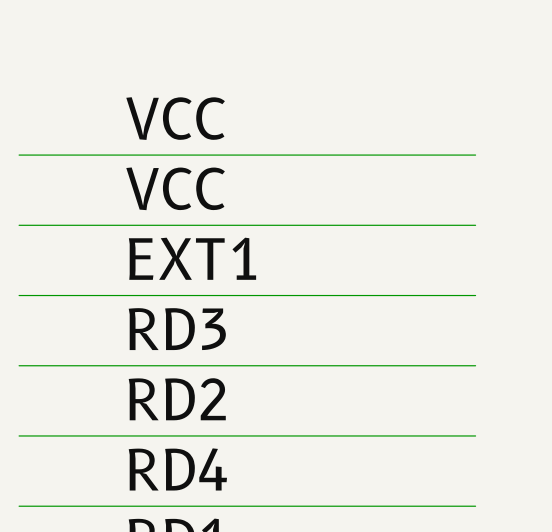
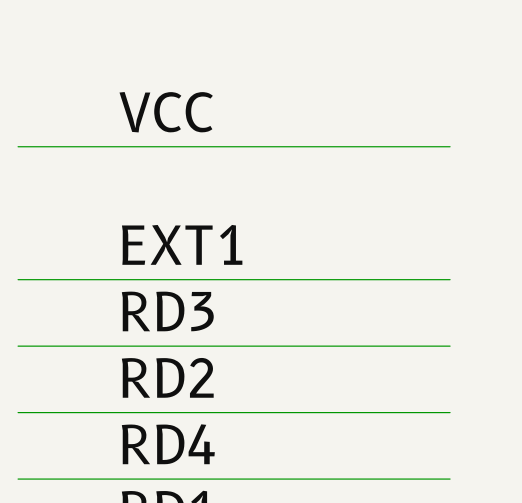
label: VCC (175, 188) -> none
wire: (19, 225) (475, 225) -> none

